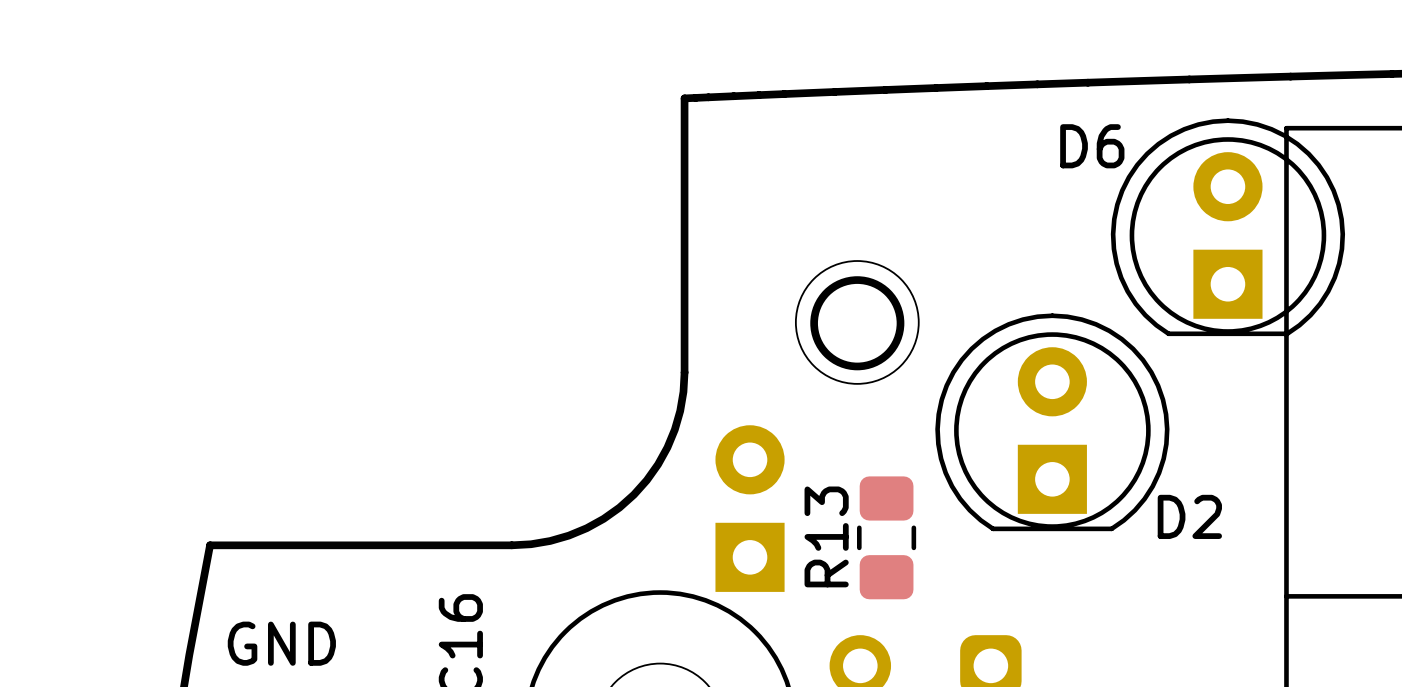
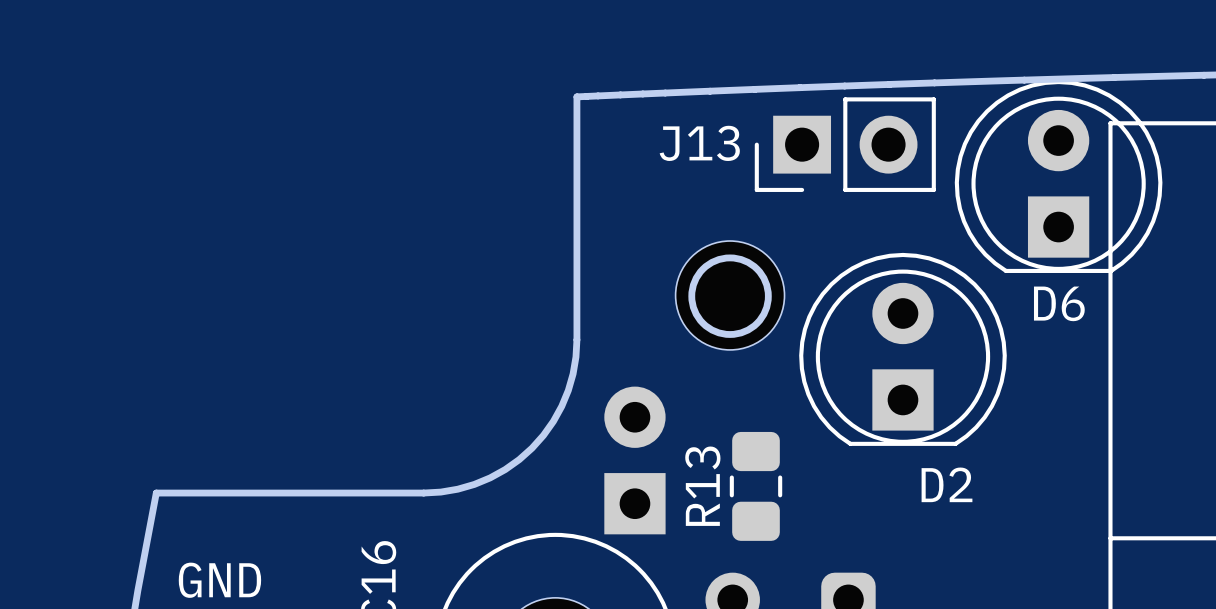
D6 name position: D6 (1092, 146) -> D6 (1059, 303)
J13: none -> (845, 144)
D6 position: (1227, 227) -> (1058, 176)
D2 position: (1052, 422) -> (902, 349)
D2 name position: D2 (1189, 516) -> D2 (946, 484)

